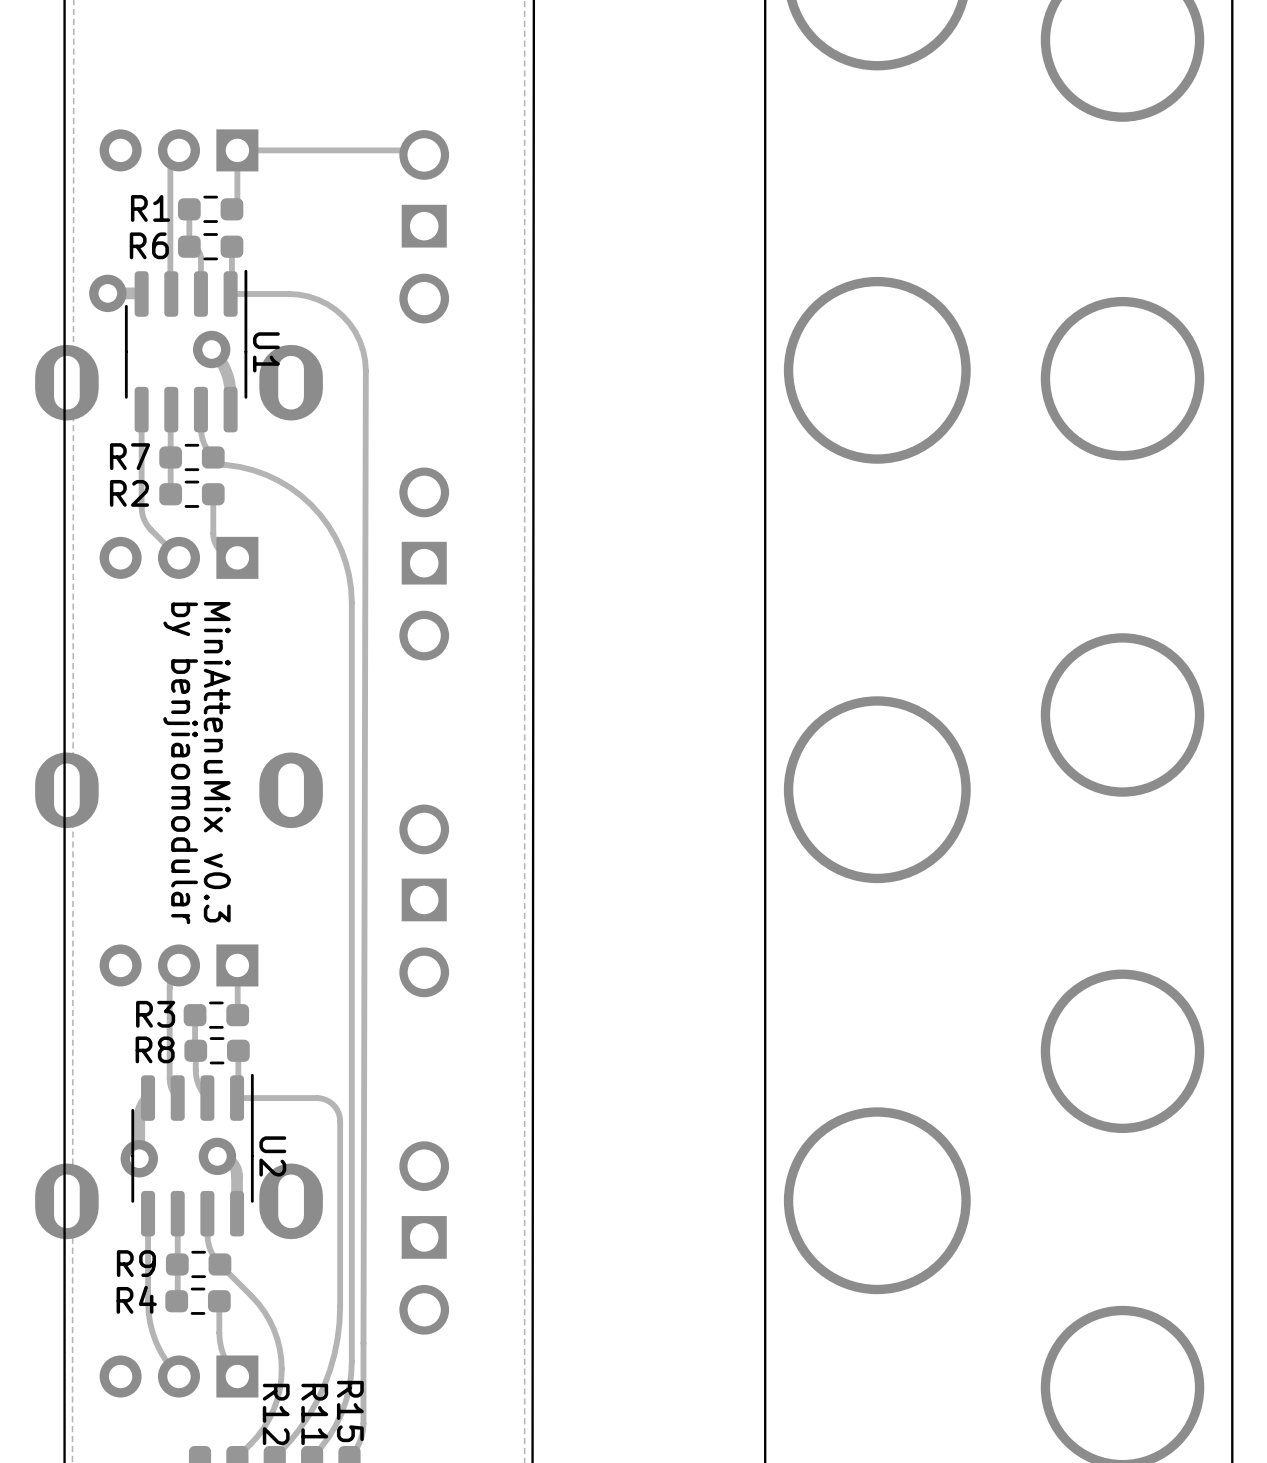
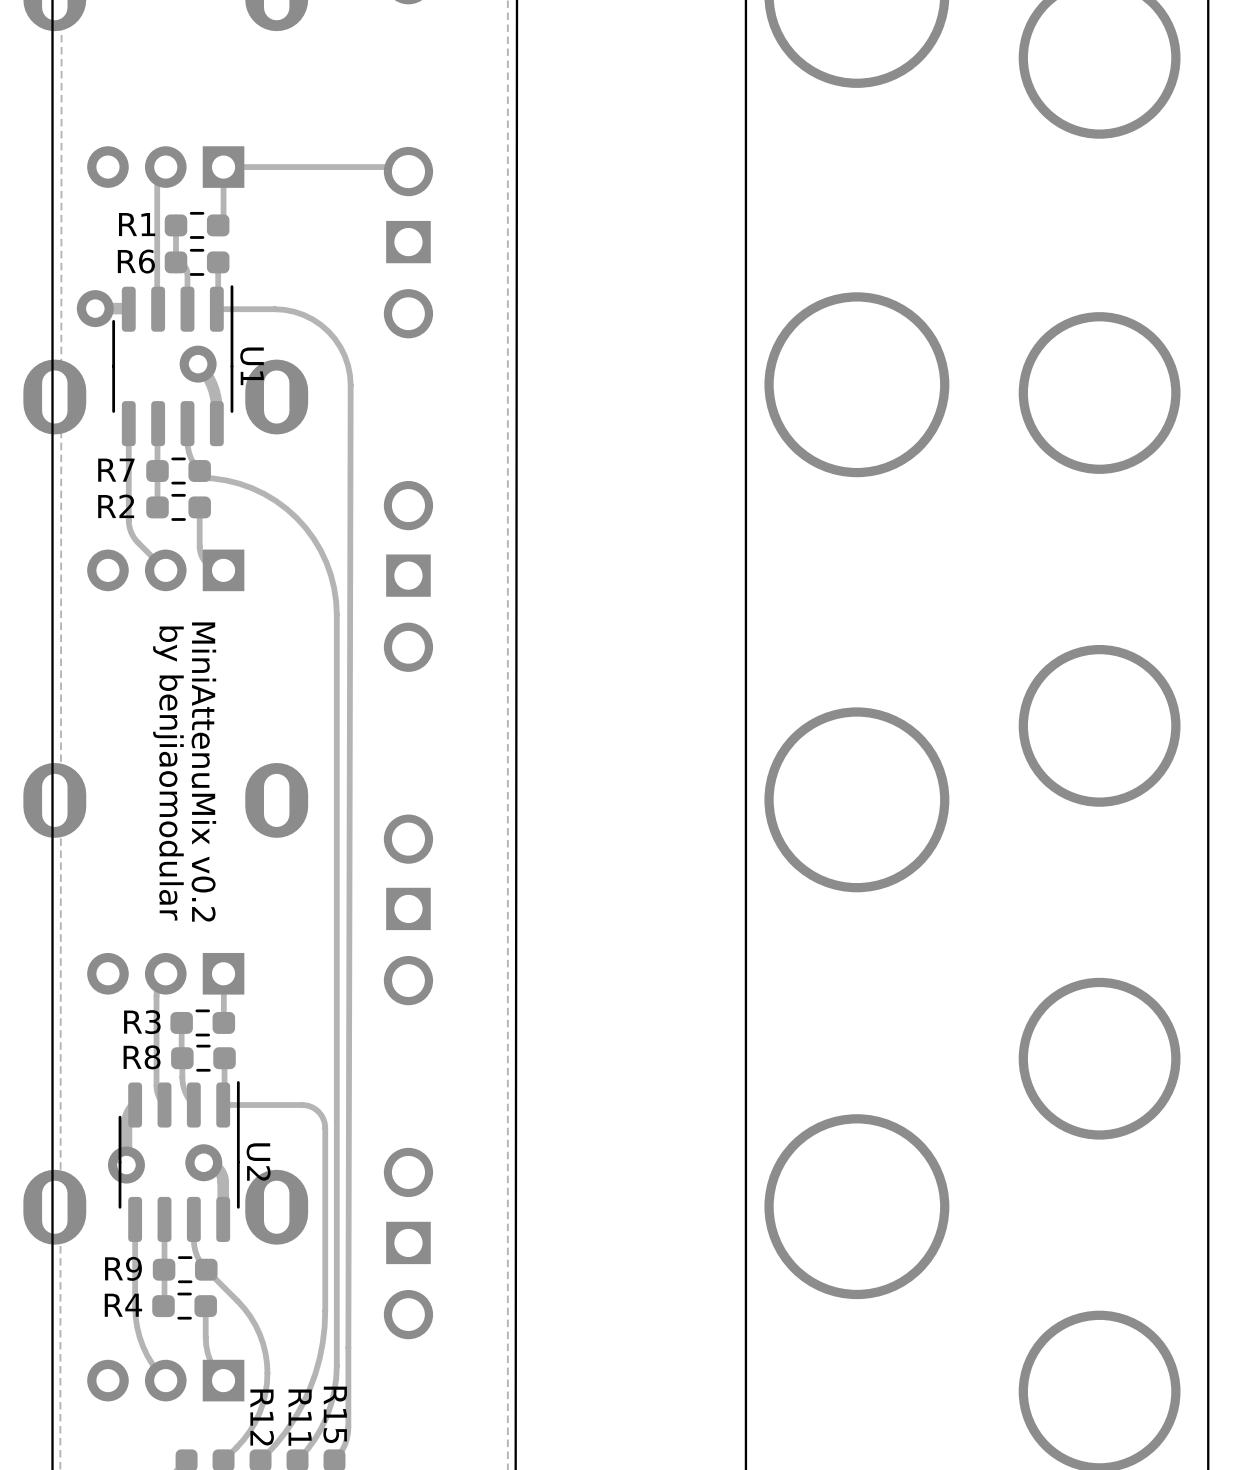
text: MiniAttenuMix v0.3 (217, 762) -> MiniAttenuMix v0.2 (203, 772)

